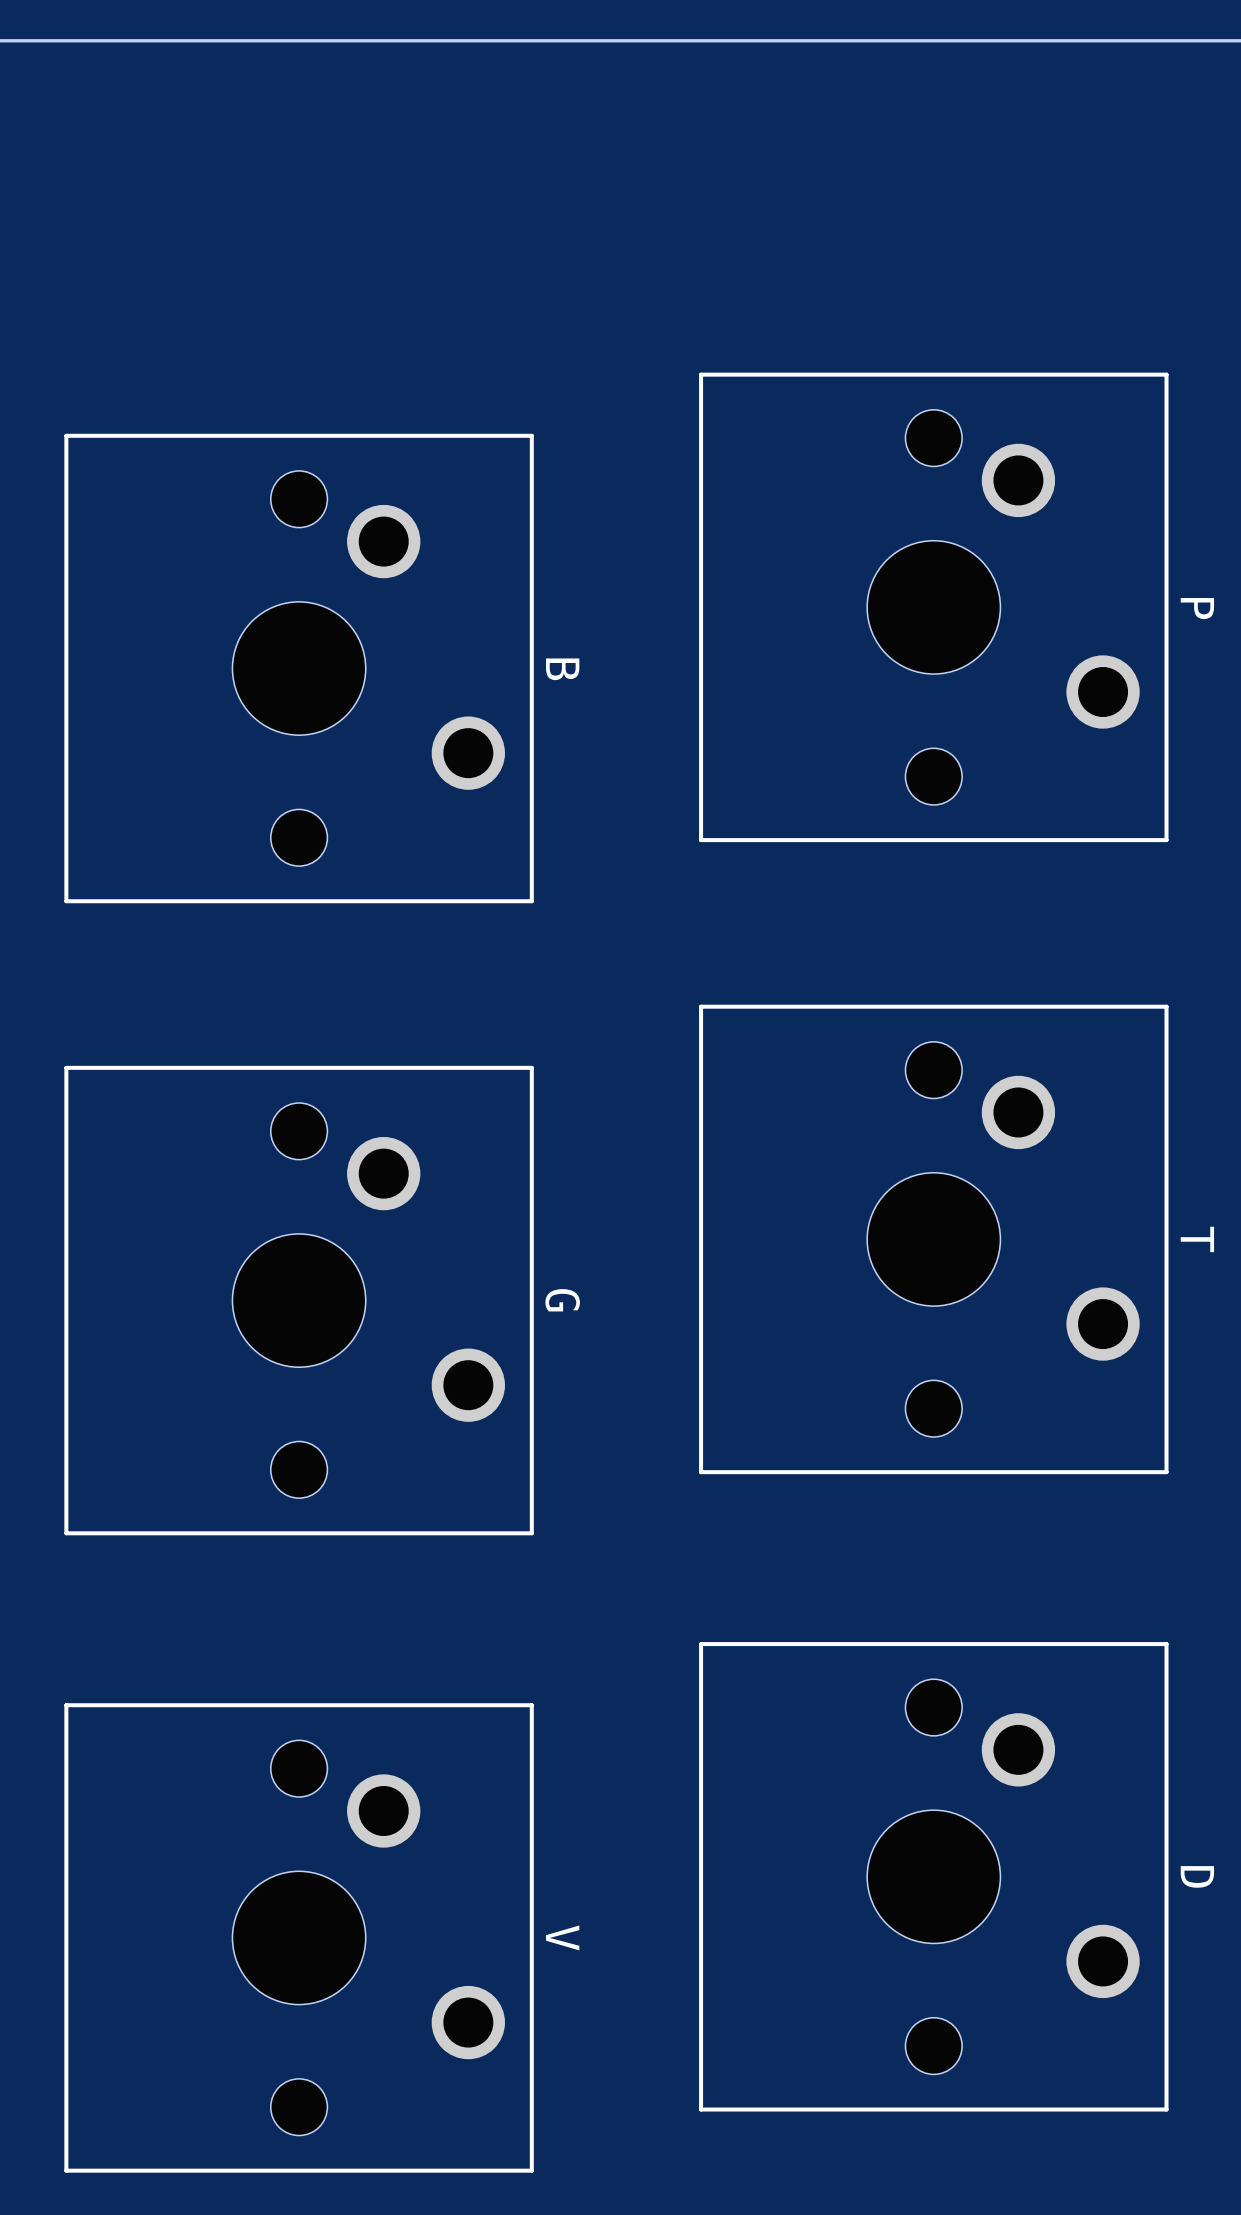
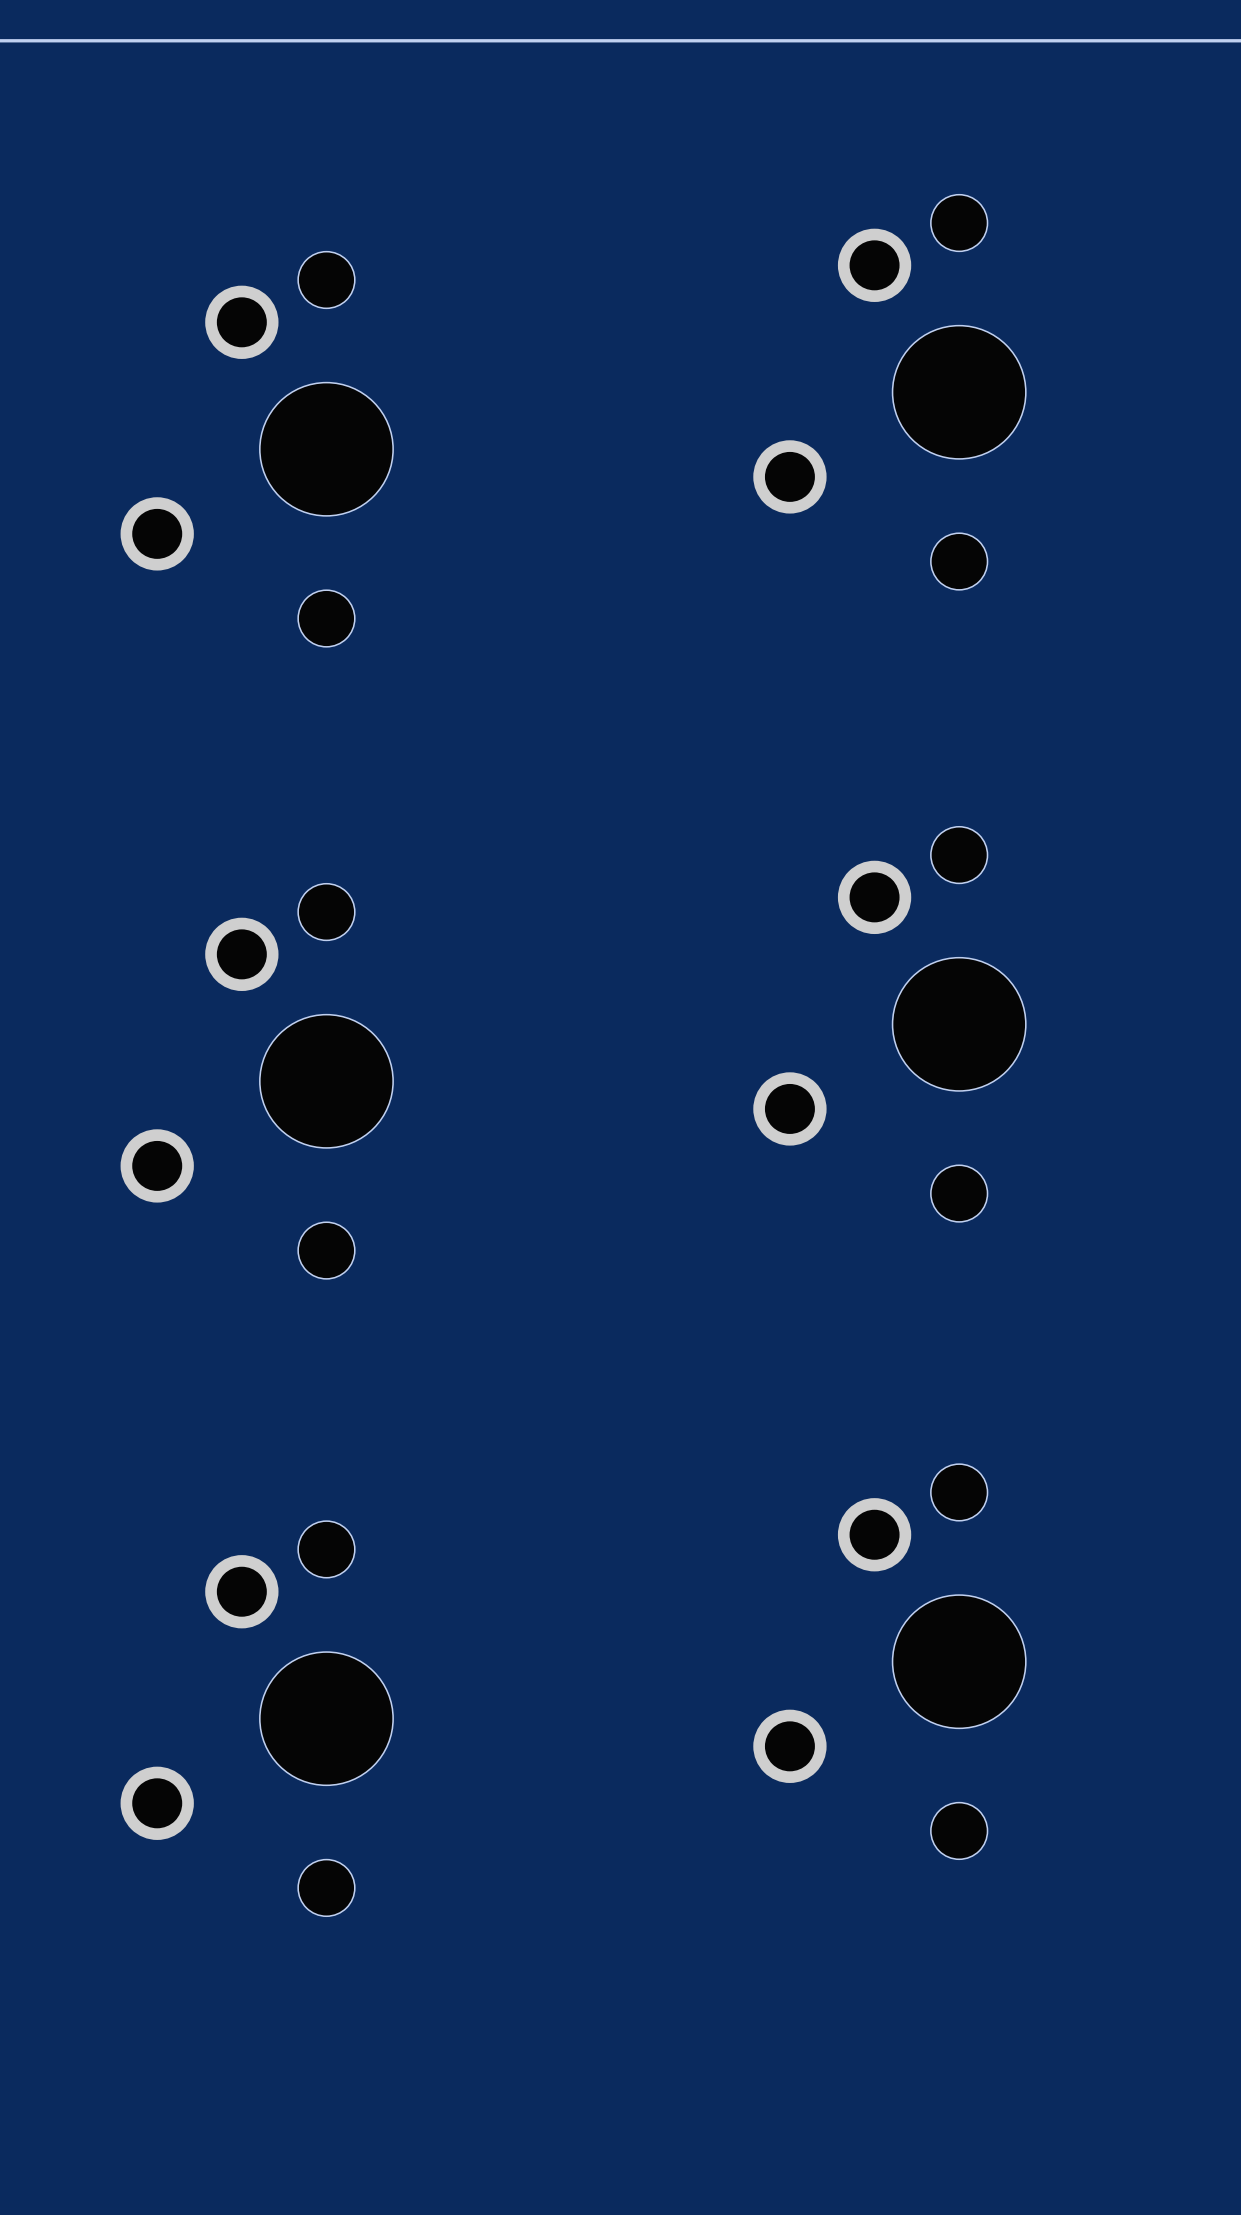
P side: bottom (933, 607) -> top (256, 449)
B side: bottom (299, 668) -> top (889, 392)
T side: bottom (933, 1239) -> top (256, 1081)
G side: bottom (299, 1300) -> top (889, 1024)
D side: bottom (933, 1876) -> top (256, 1718)
V side: bottom (299, 1937) -> top (889, 1661)

